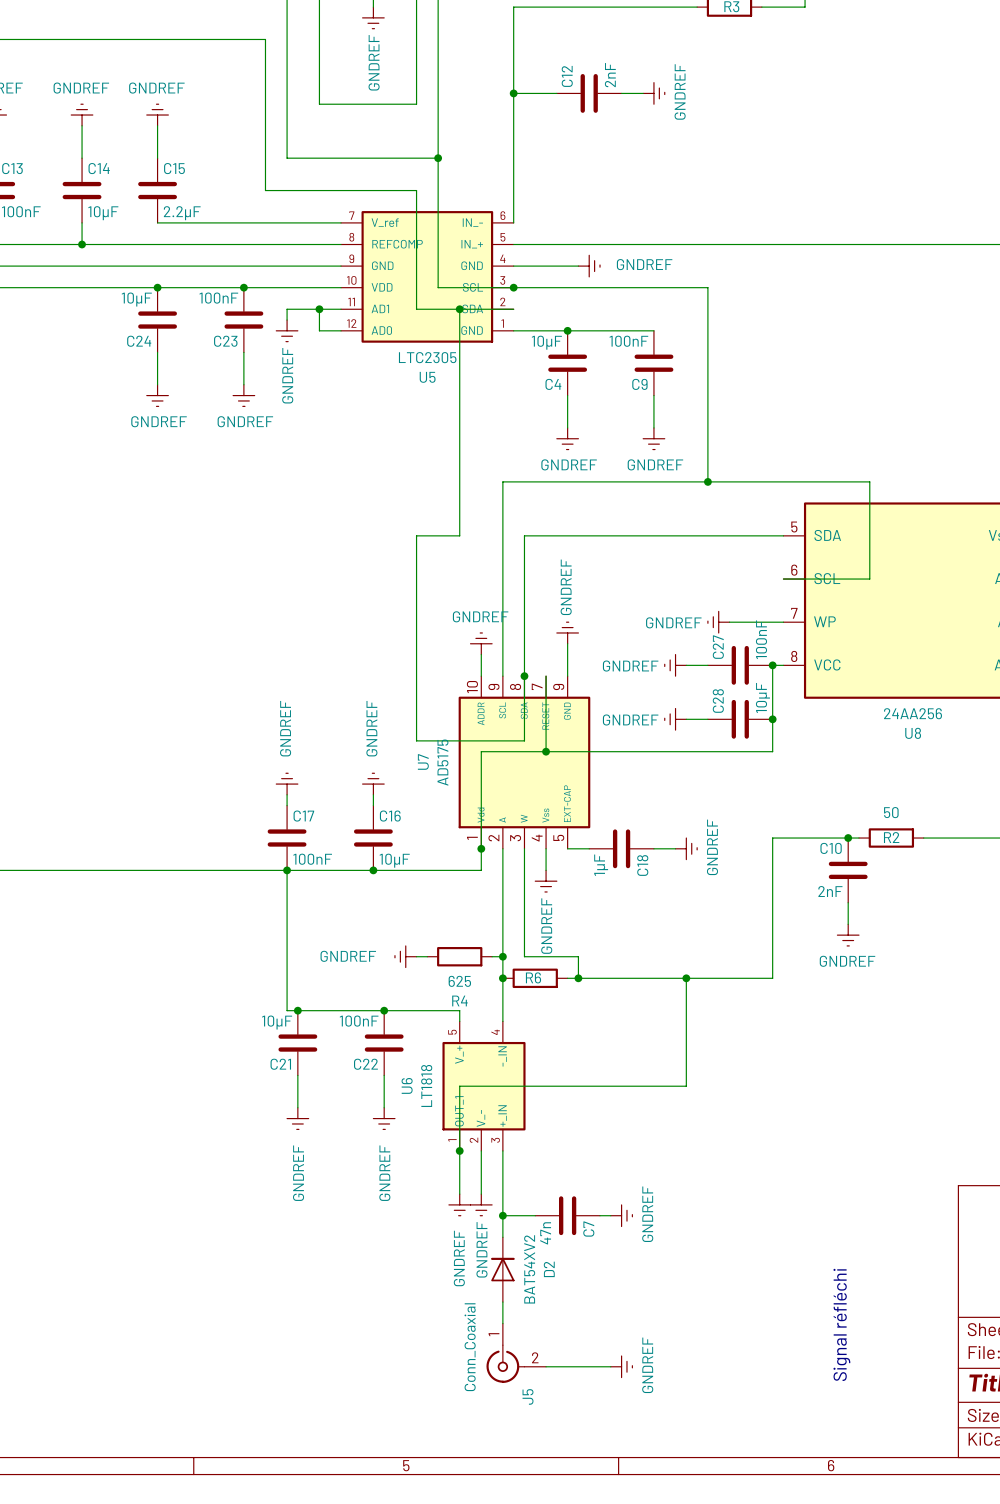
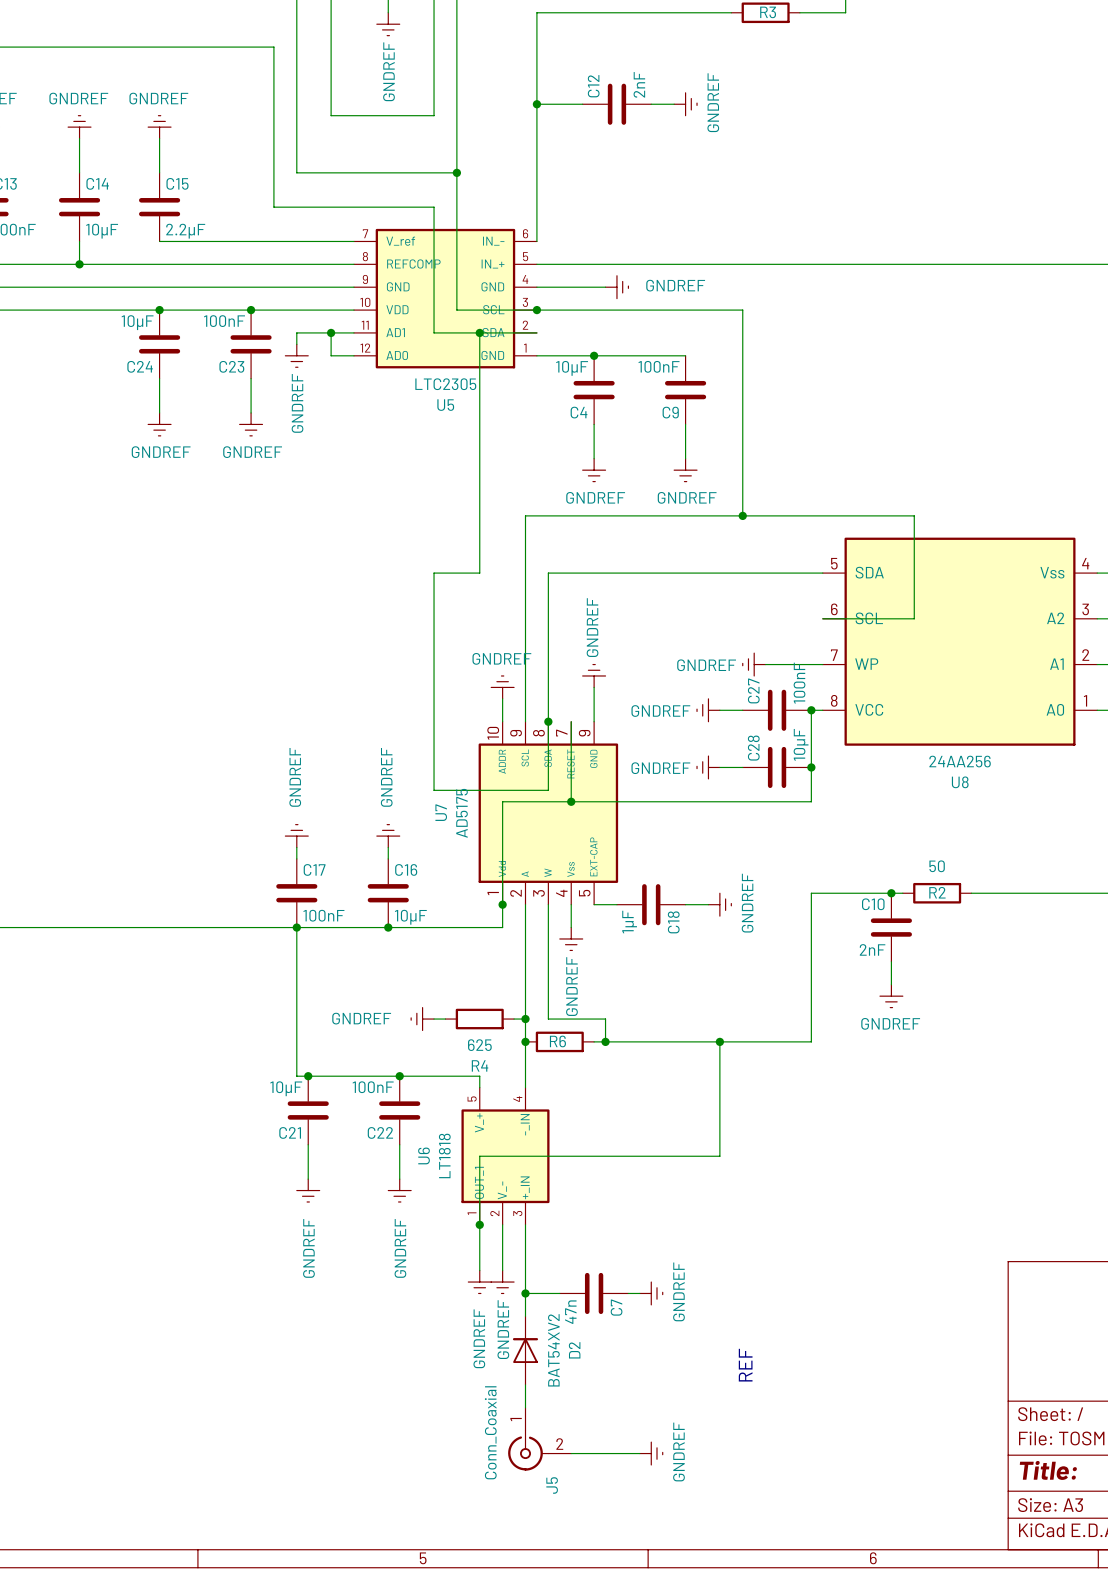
text: none -> REF (745, 1365)
text: Signal réfléchi (841, 1324) -> none

